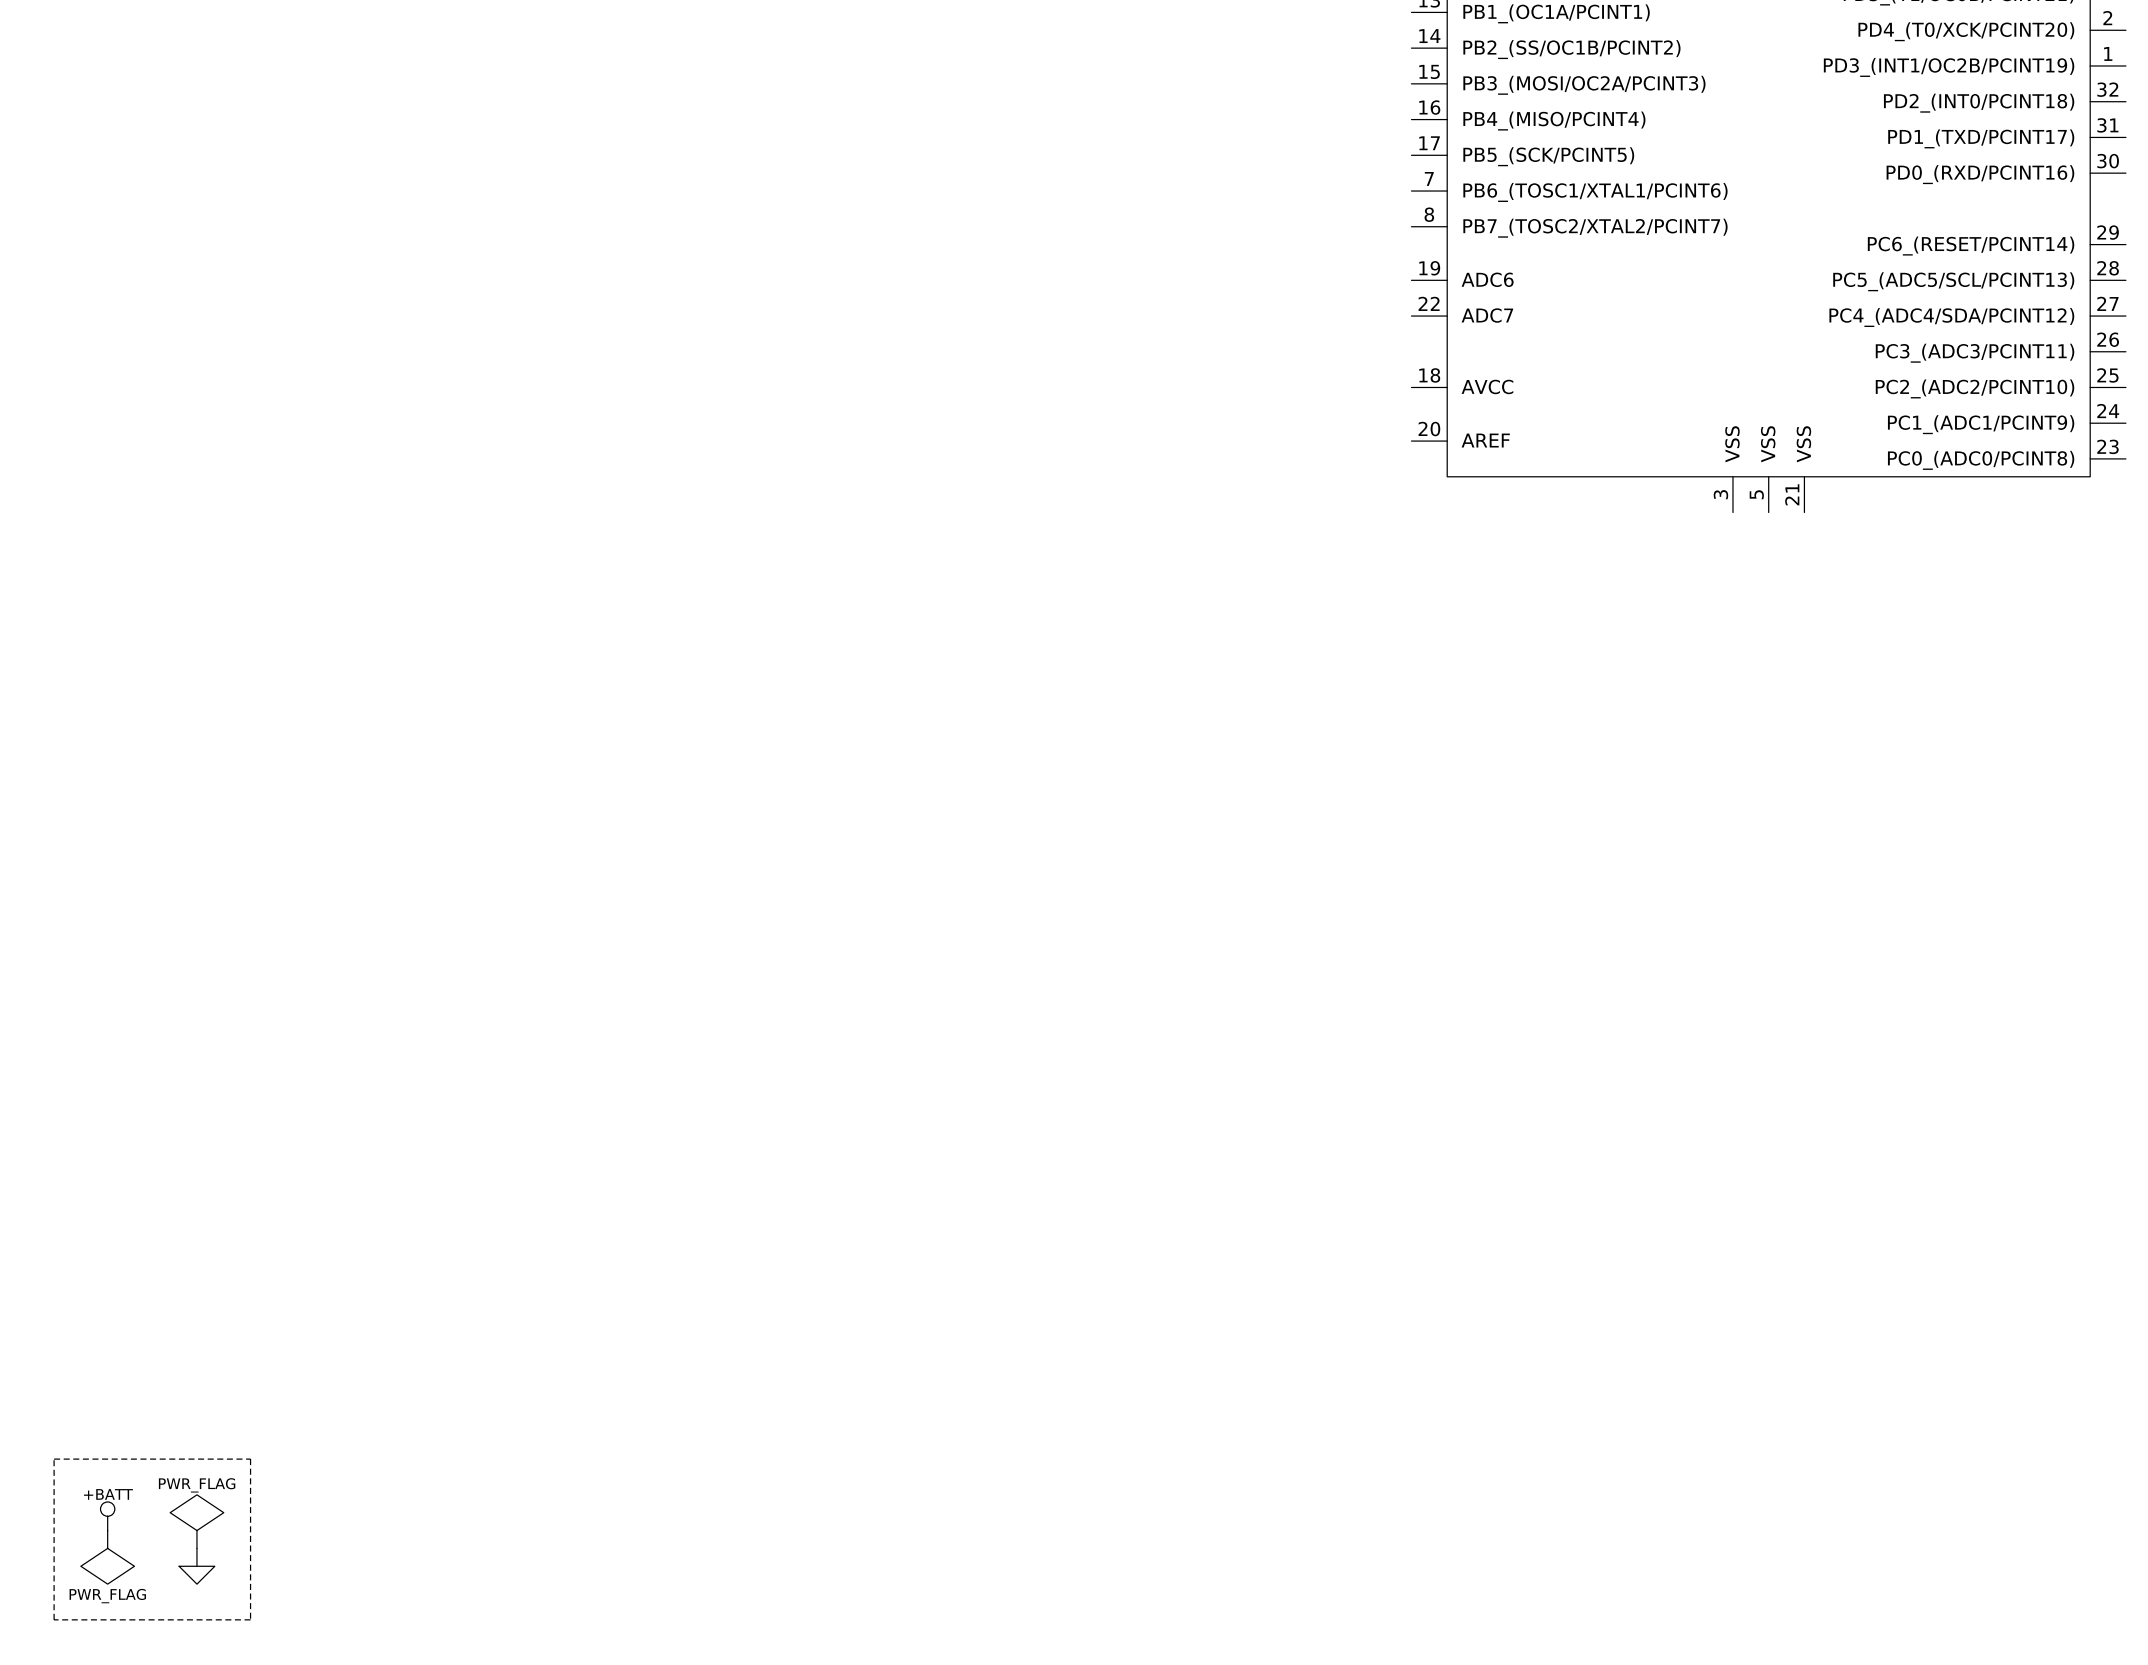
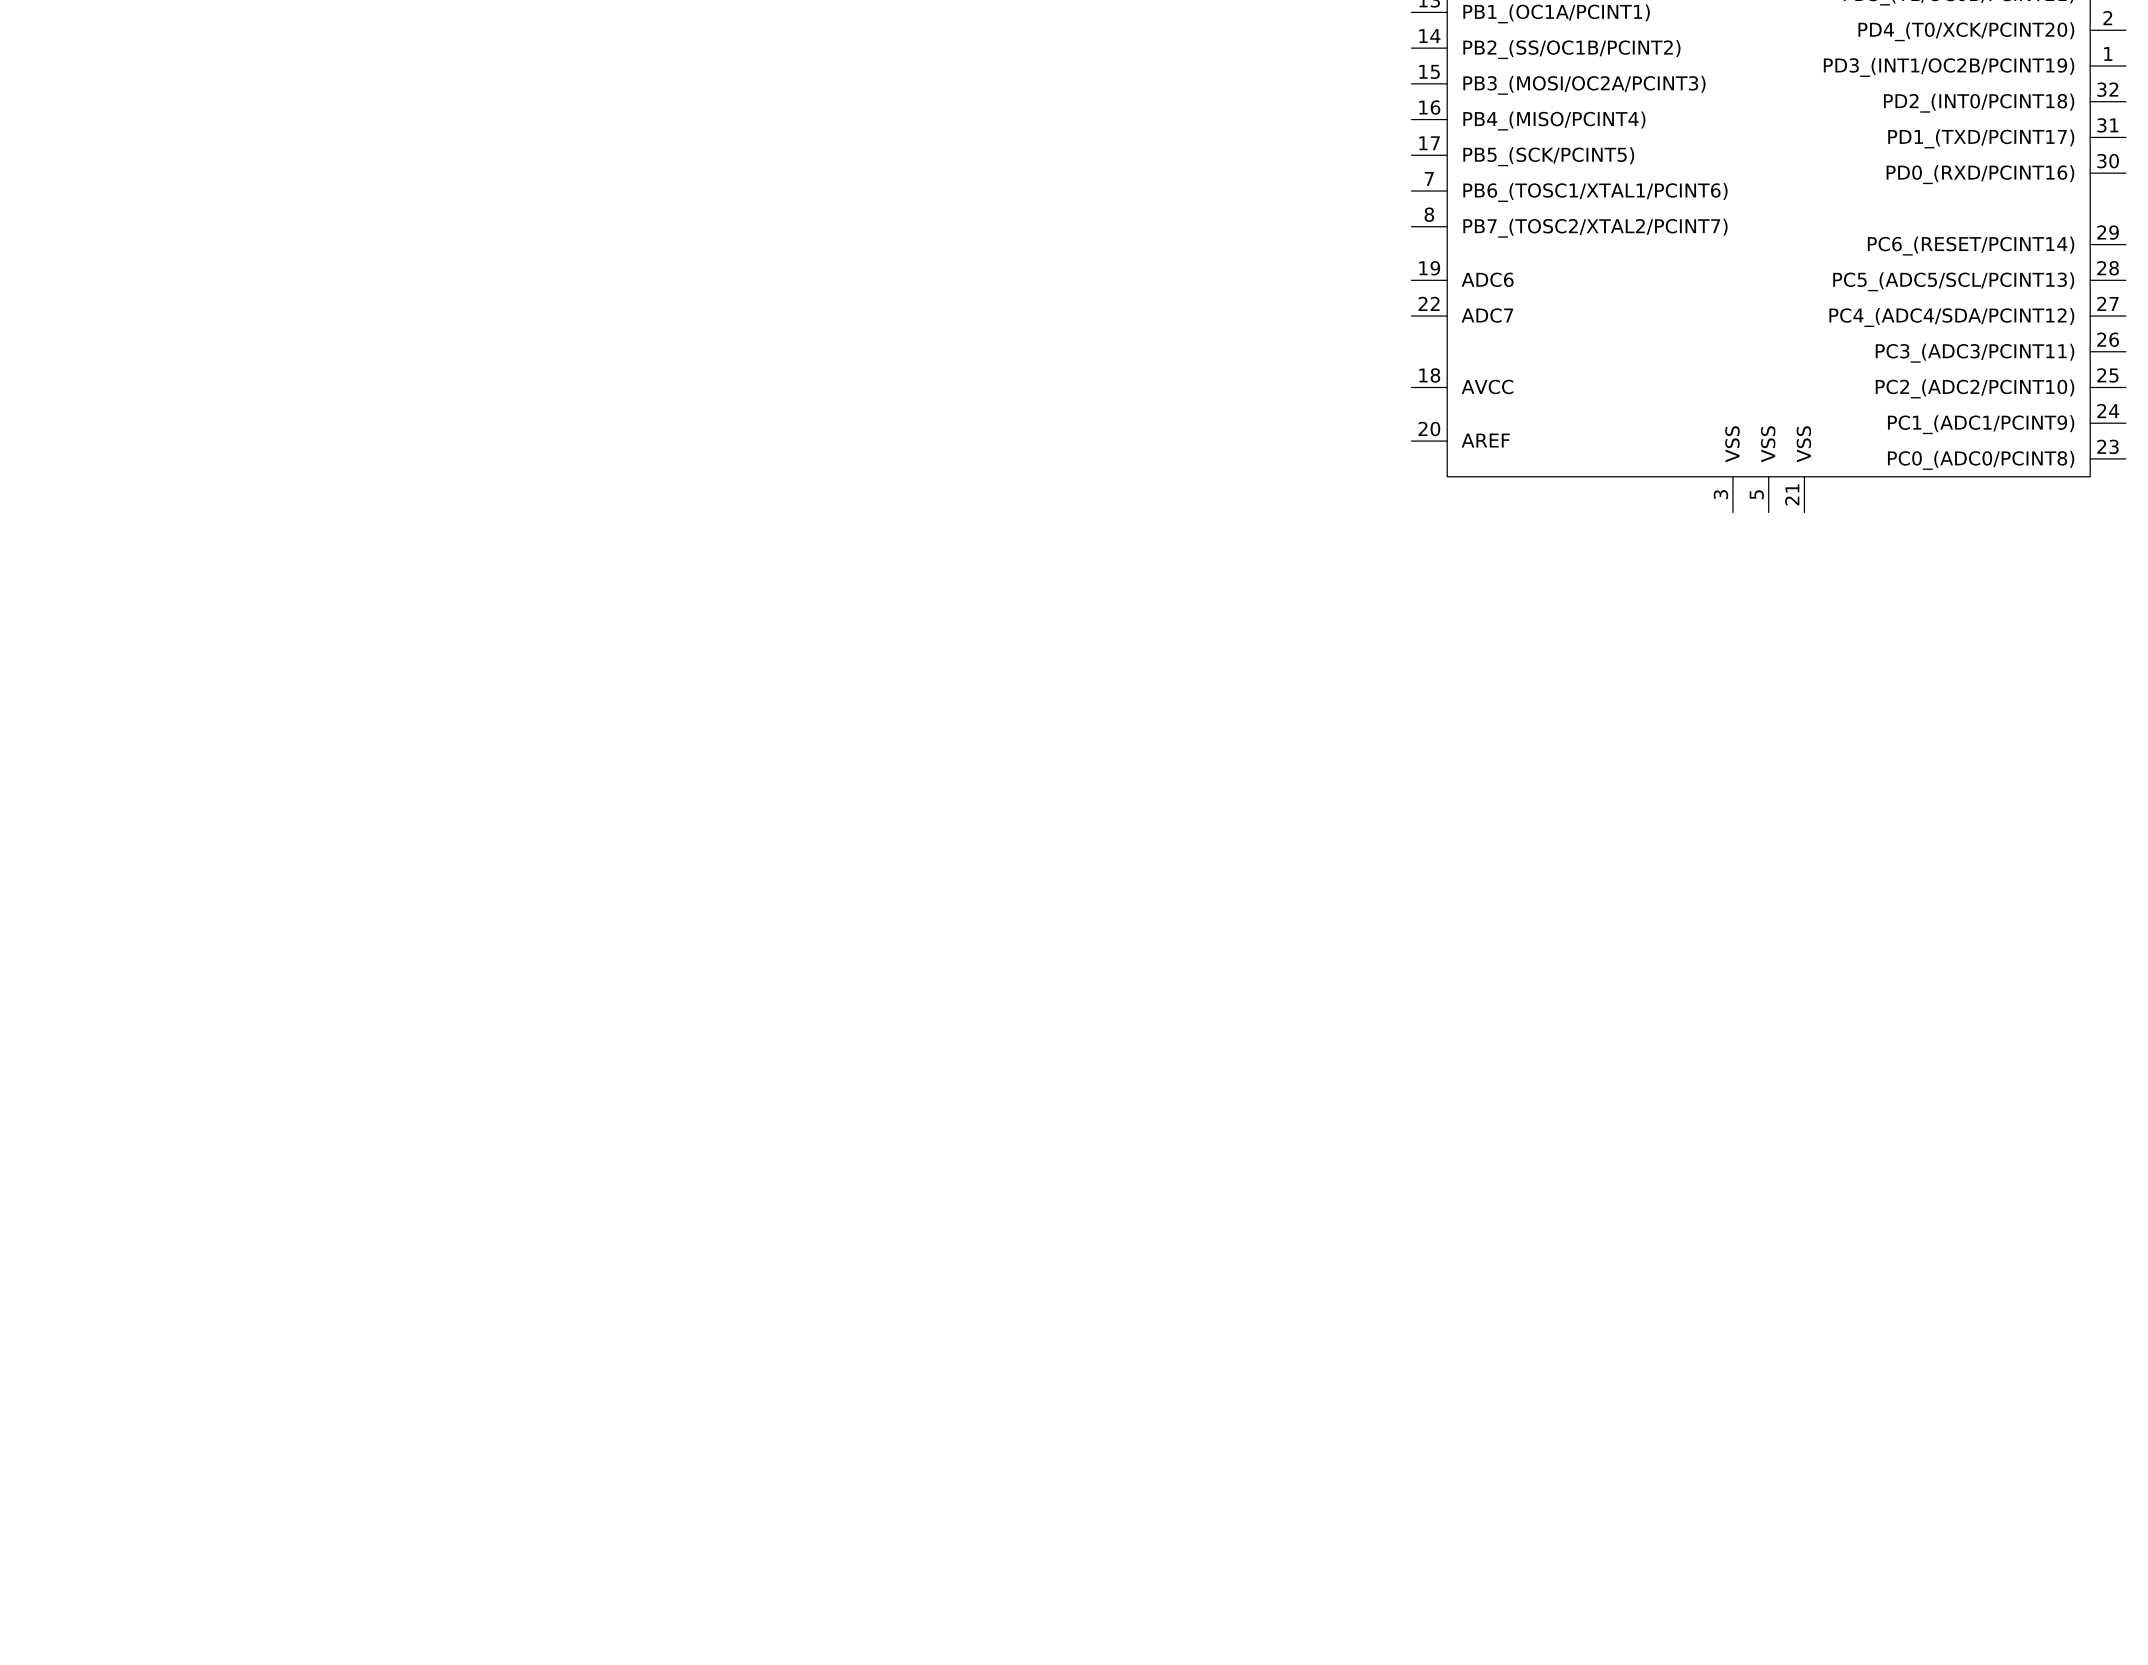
line: (54, 1459) (250, 1459) (250, 1619) (54, 1619) (54, 1459) -> none
power symbol: +BATT (107, 1516) -> none
power symbol: PWR_FLAG (196, 1521) -> none
wire: (196, 1548) (196, 1566) -> none
power symbol: PWR_FLAG (107, 1557) -> none
power symbol: (196, 1575) -> none

